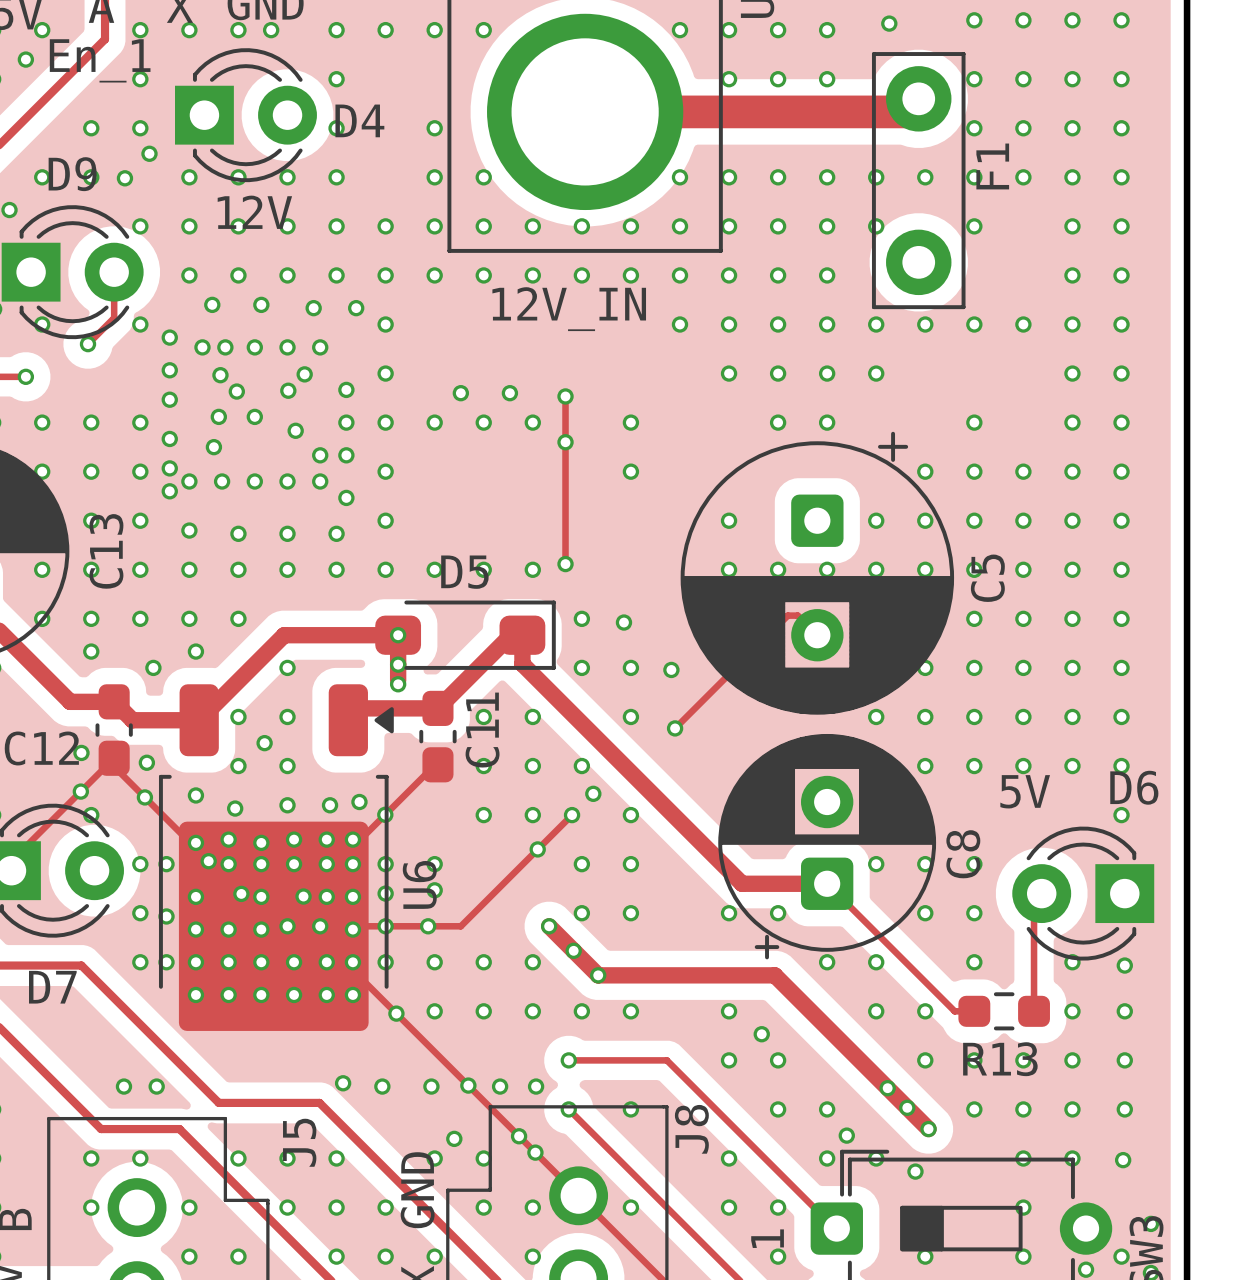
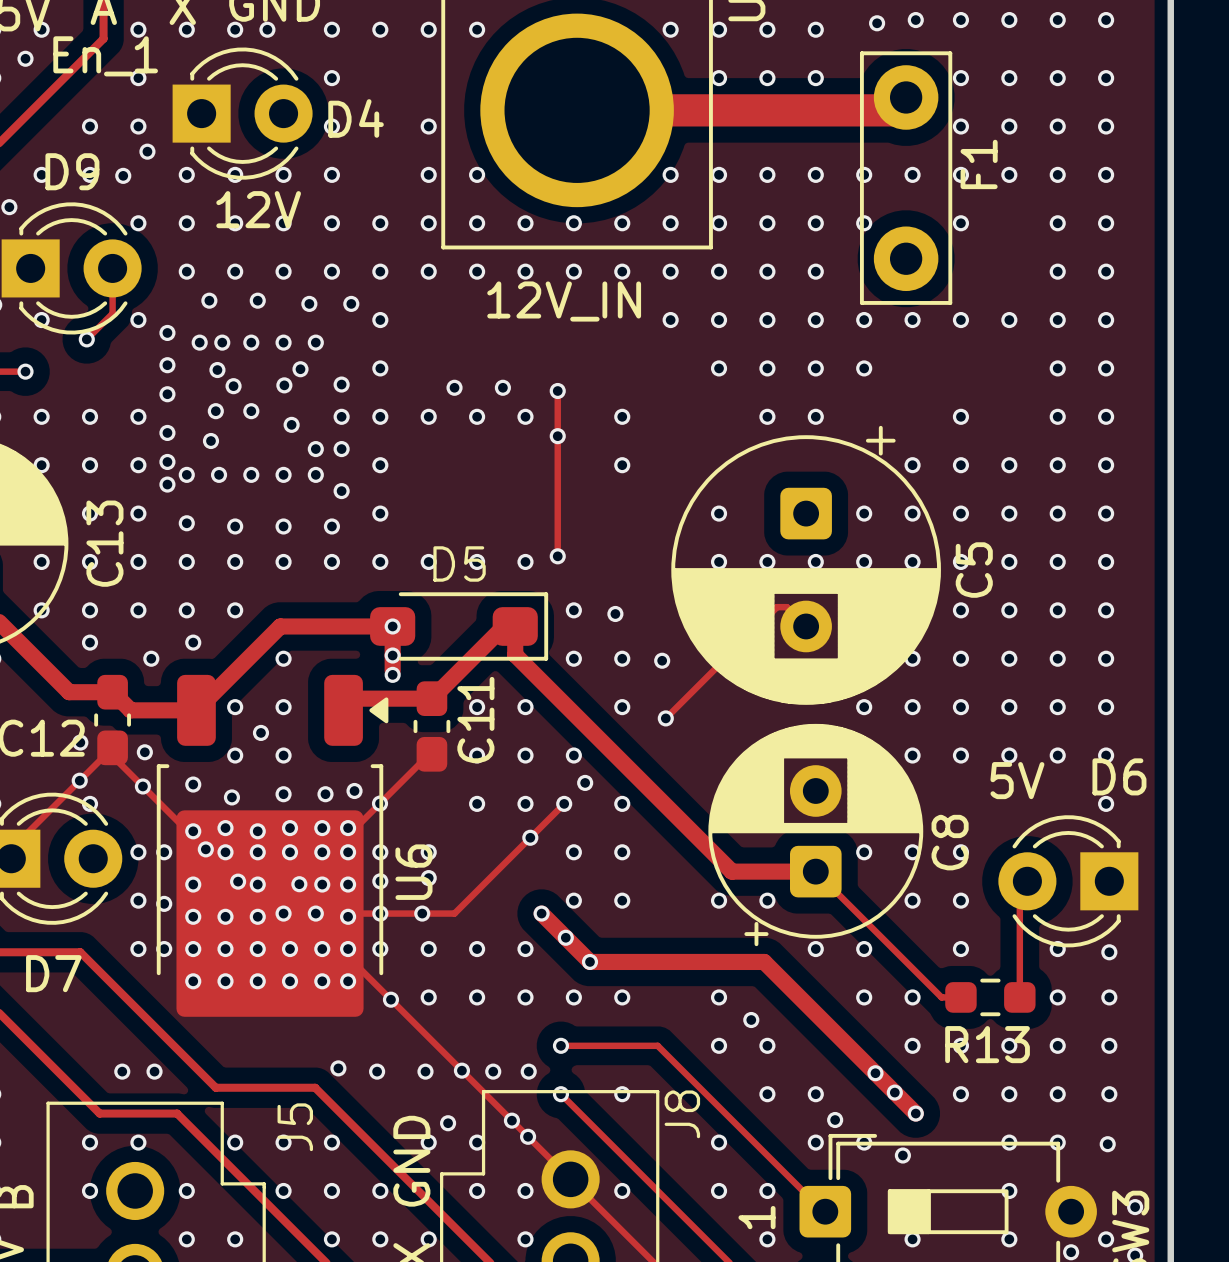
via: none -> (915, 20)

